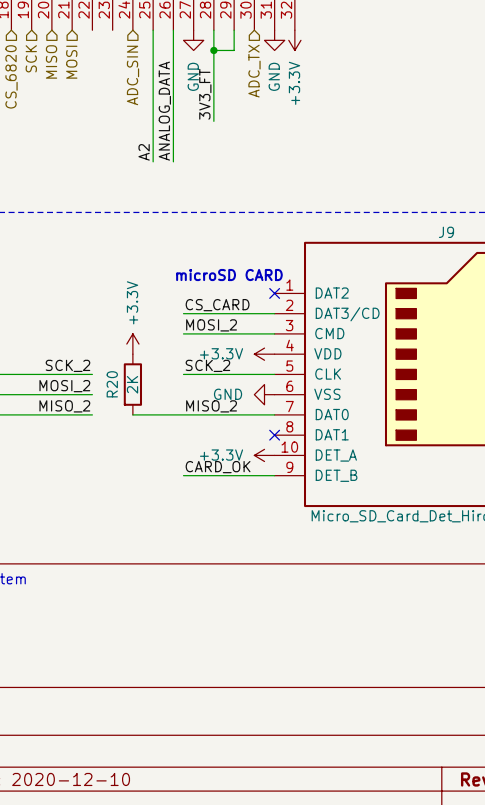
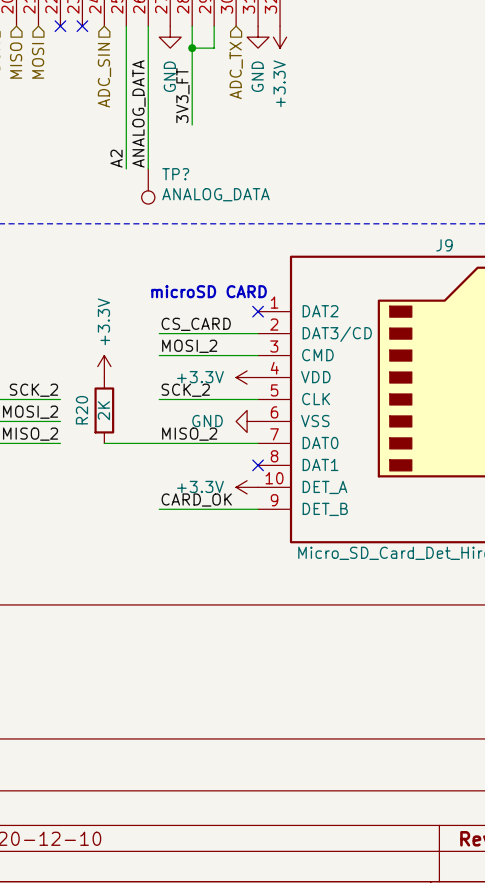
no-connect mark: none -> (60, 26)
no-connect mark: none -> (82, 26)
TP?: none -> ANALOG_DATA (148, 186)

